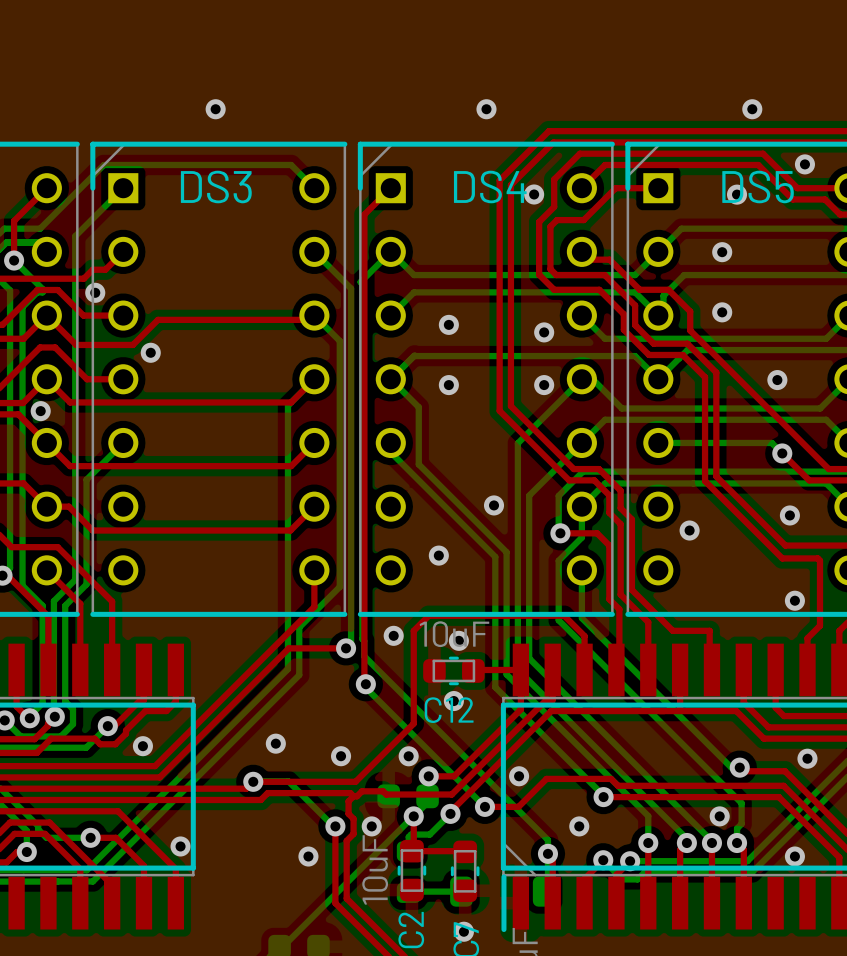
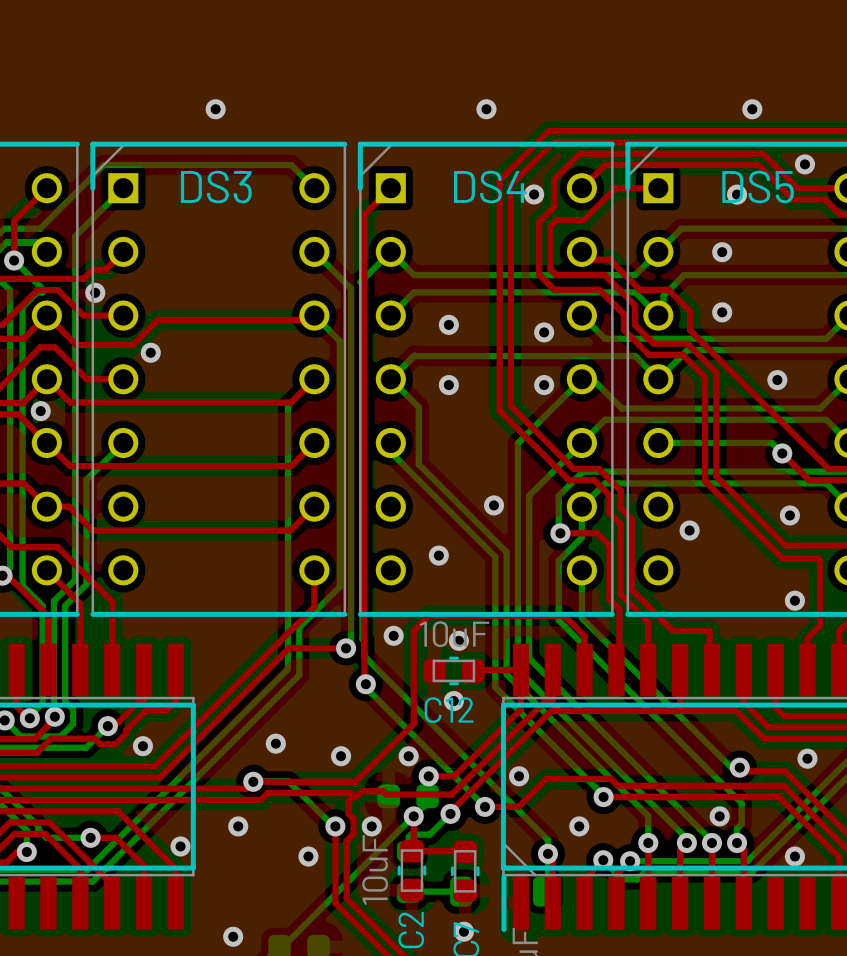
via: none -> (238, 826)
via: none -> (233, 936)

